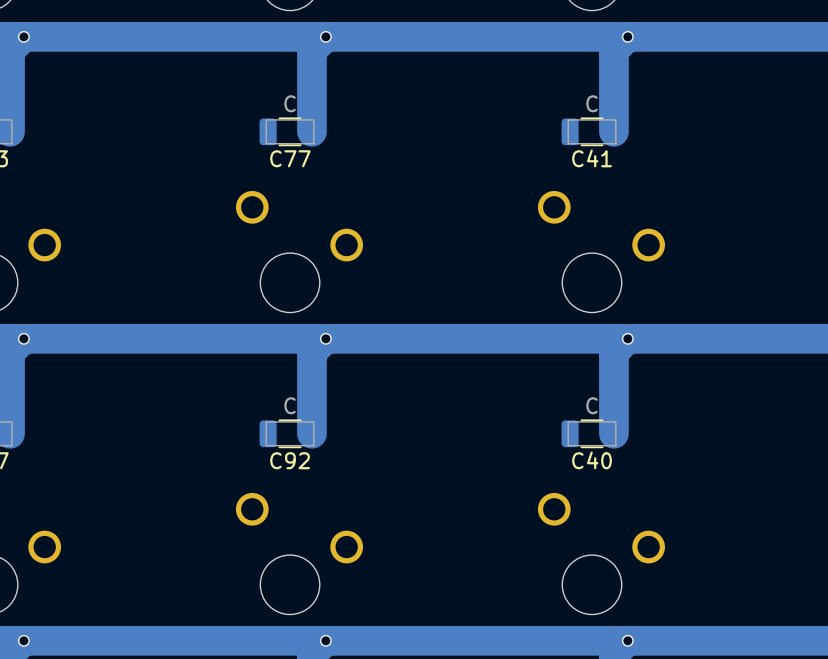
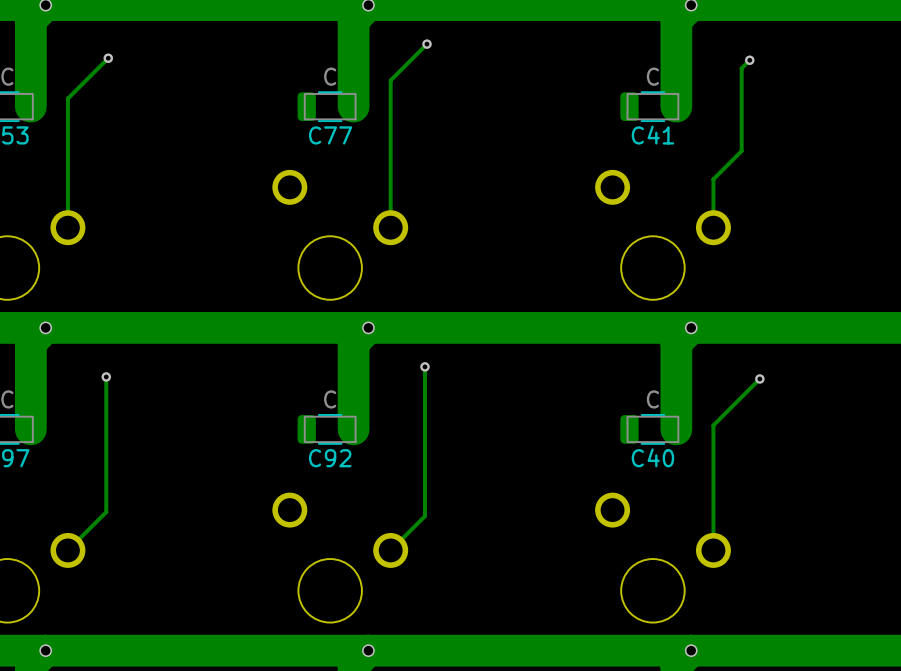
track: none -> (427, 44) (390, 80) (390, 227)
via: none -> (427, 44)
track: none -> (108, 58) (67, 98) (67, 227)
via: none -> (108, 58)
track: none -> (749, 60) (741, 68) (741, 151) (713, 179) (713, 227)
via: none -> (749, 60)
track: none -> (424, 366) (424, 516) (390, 550)
via: none -> (424, 366)
track: none -> (106, 376) (106, 512) (67, 550)
via: none -> (106, 376)
track: none -> (759, 378) (713, 425) (713, 550)
via: none -> (759, 378)

